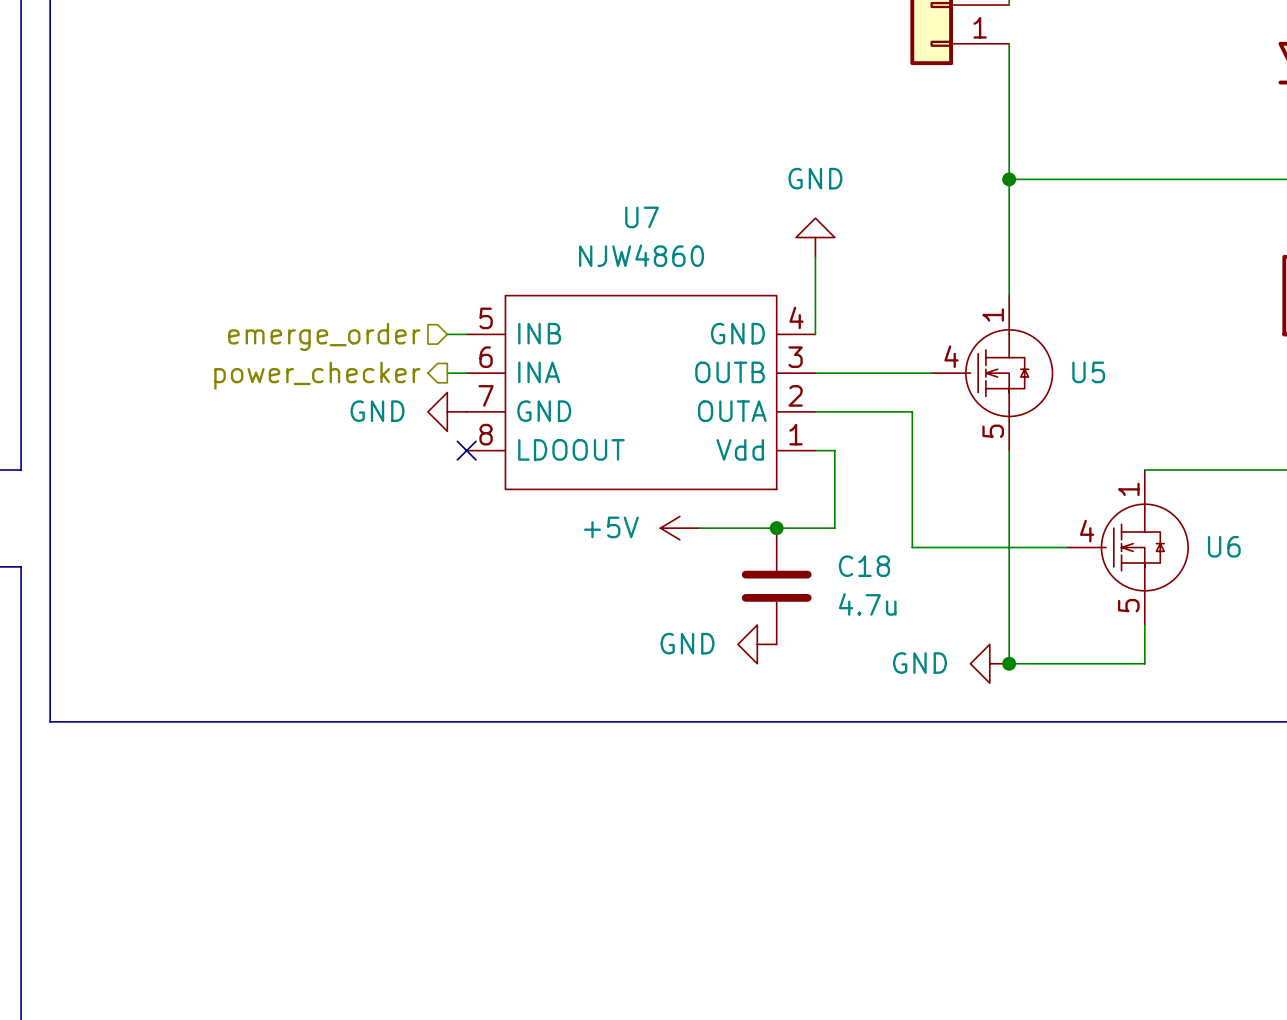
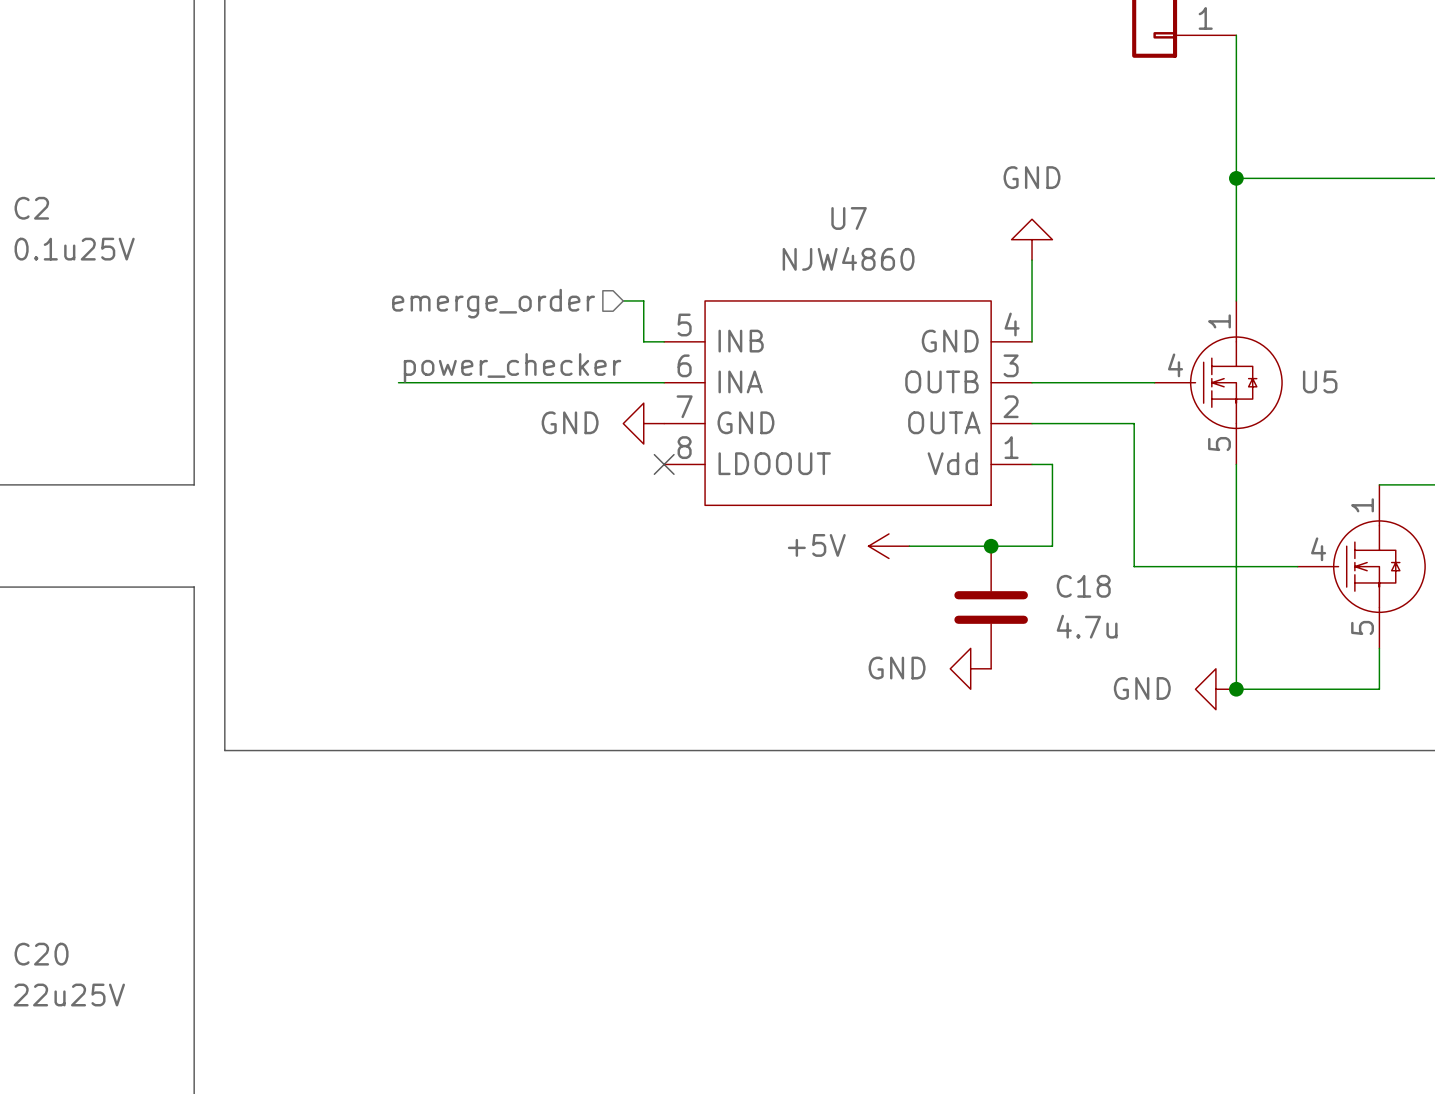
wire: none -> (623, 300) (643, 300) (643, 341)
hierarchical label position: emerge_order (324, 336) -> emerge_order (493, 303)
label: none -> power_checker (512, 367)
wire: none -> (398, 382) (643, 382)
hierarchical label: power_checker (317, 375) -> none

